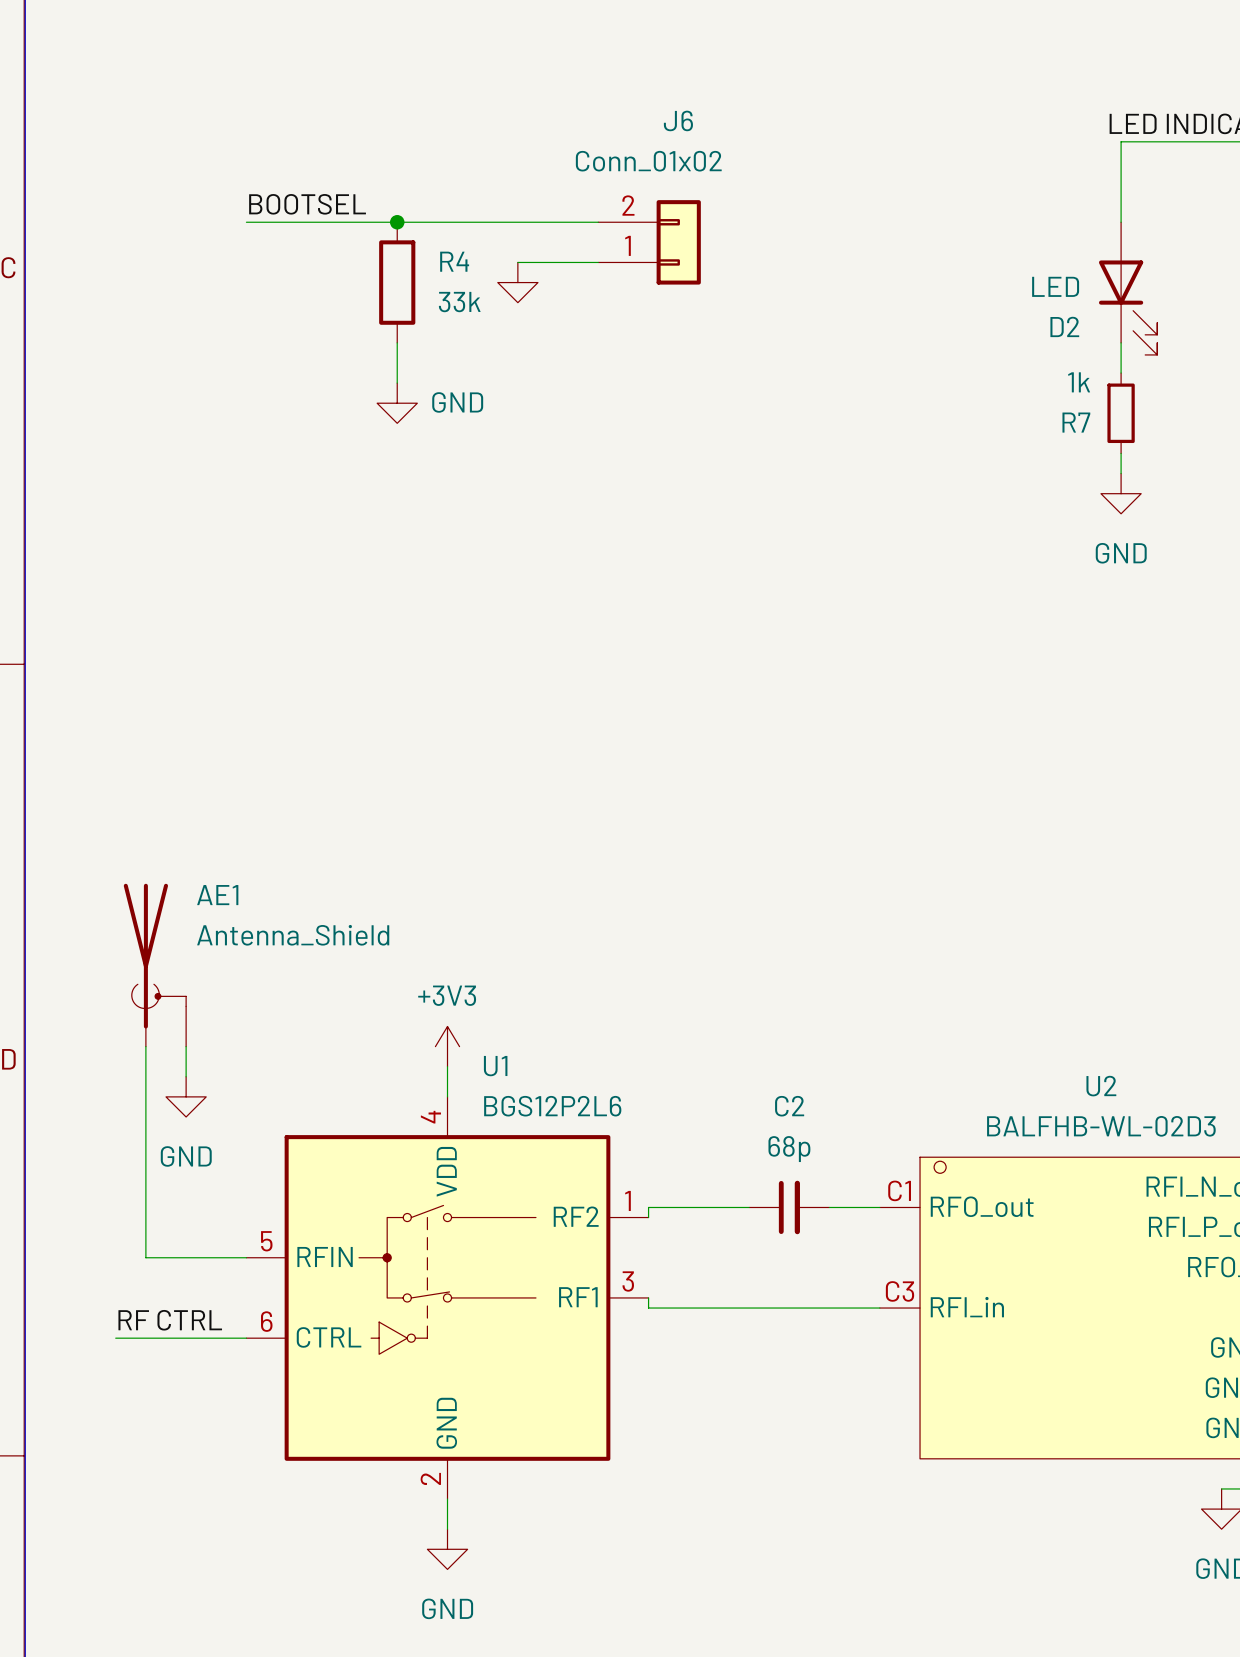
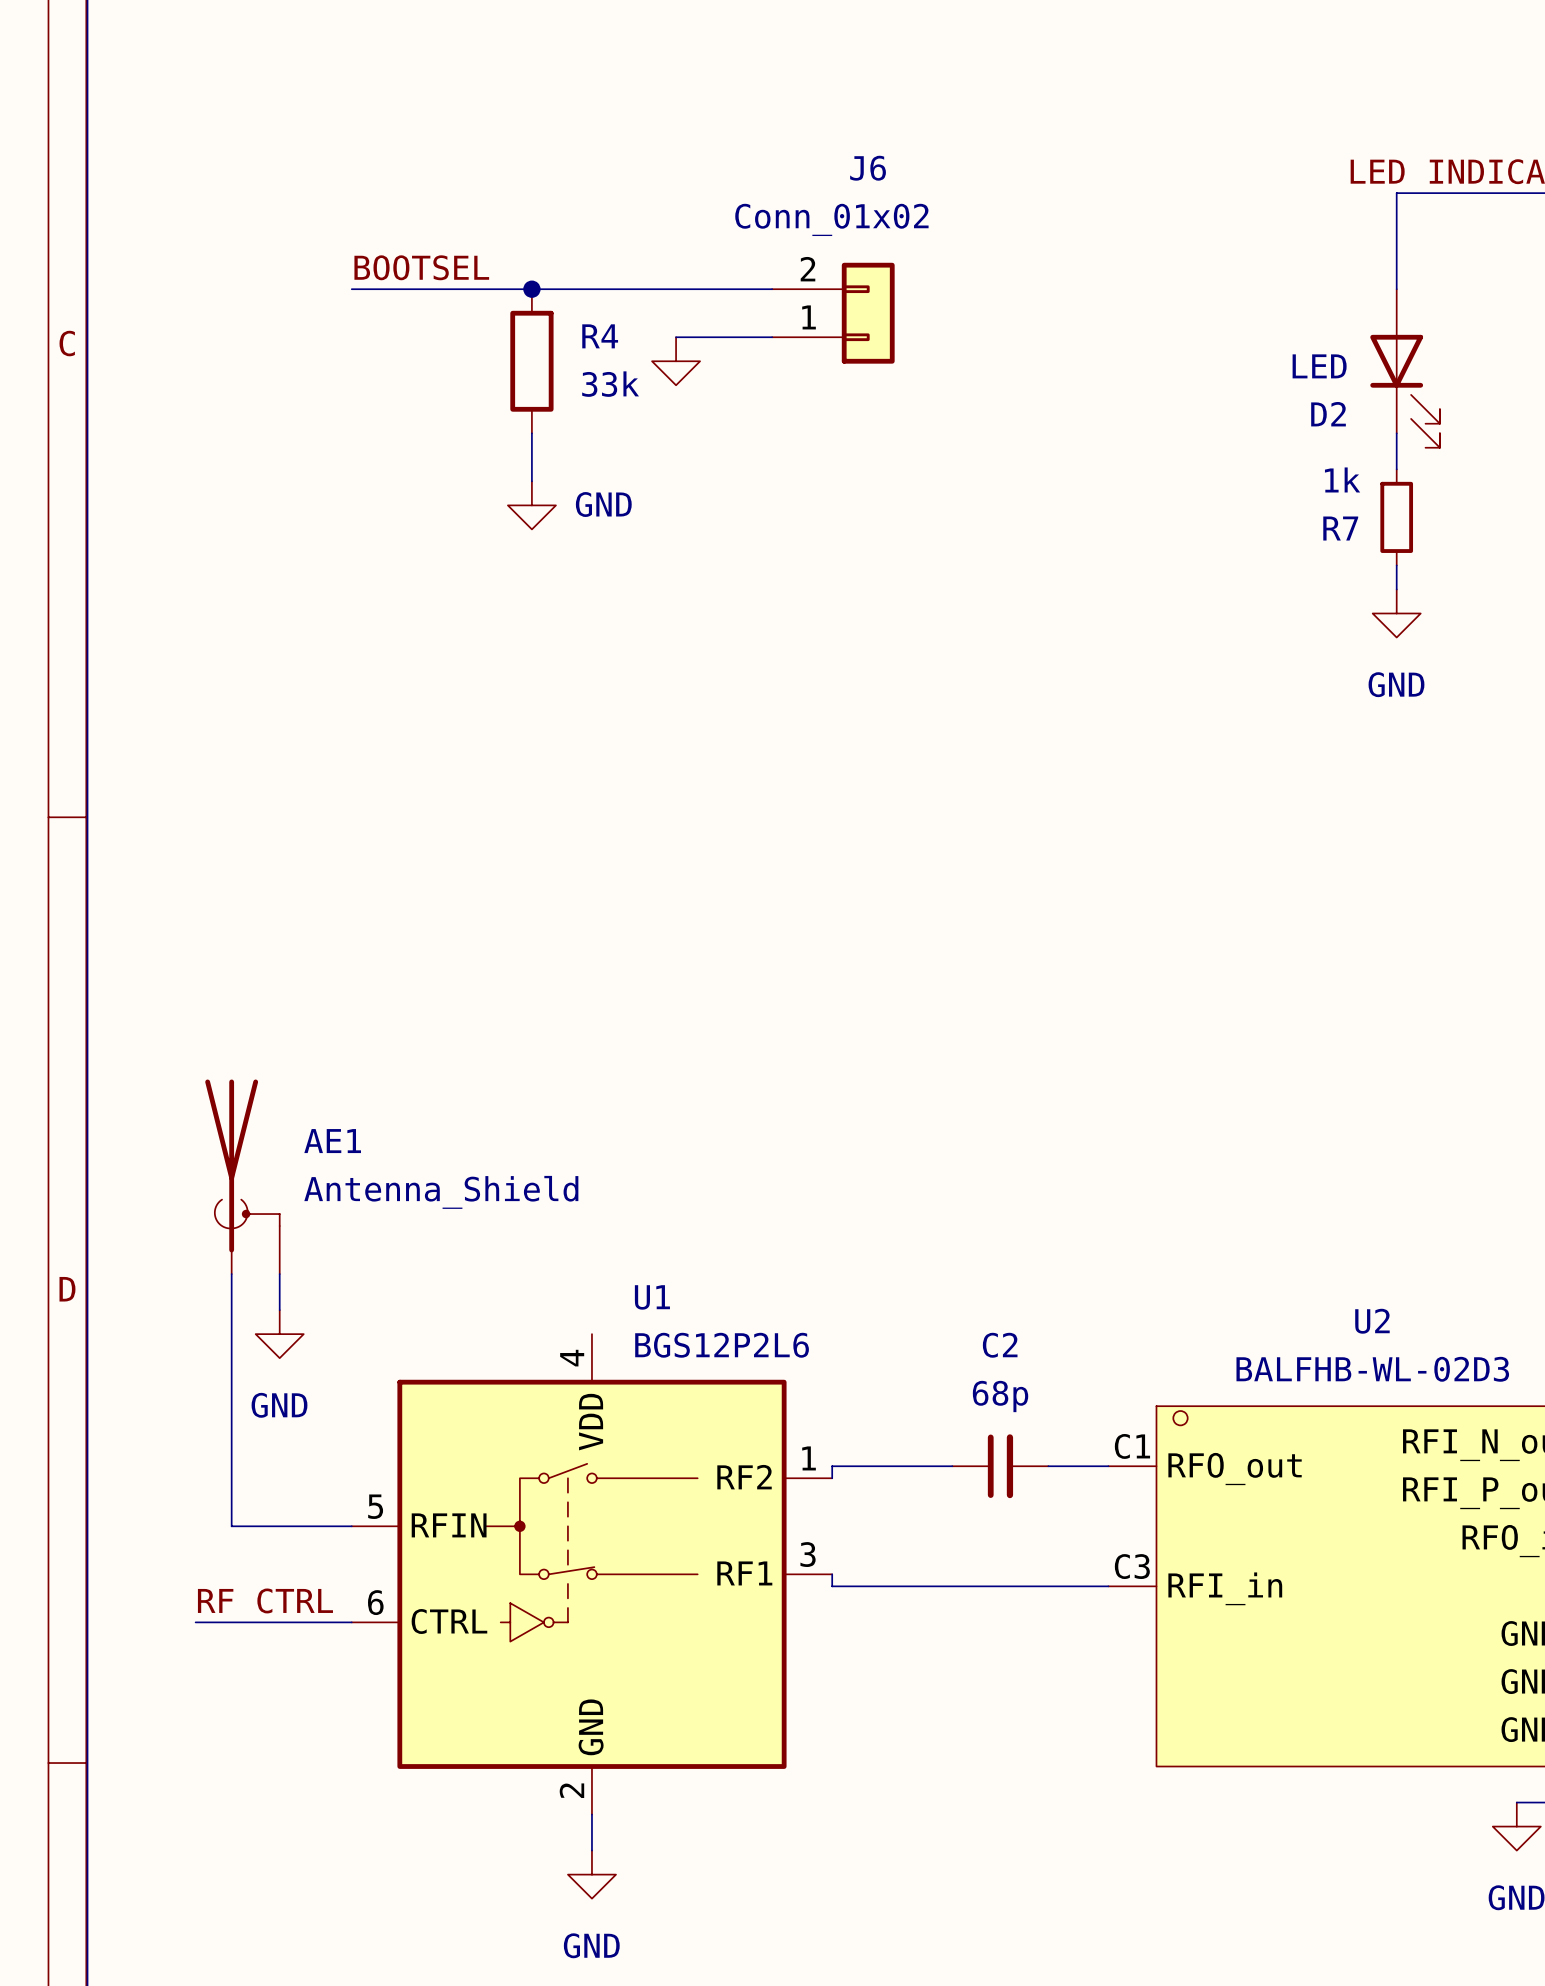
AE1 name position: AE1 (217, 895) -> AE1 (332, 1141)
AE1 value position: Antenna_Shield (293, 935) -> Antenna_Shield (441, 1192)
power symbol: +3V3 (447, 1046) -> none
wire: (447, 1066) (447, 1096) -> none

